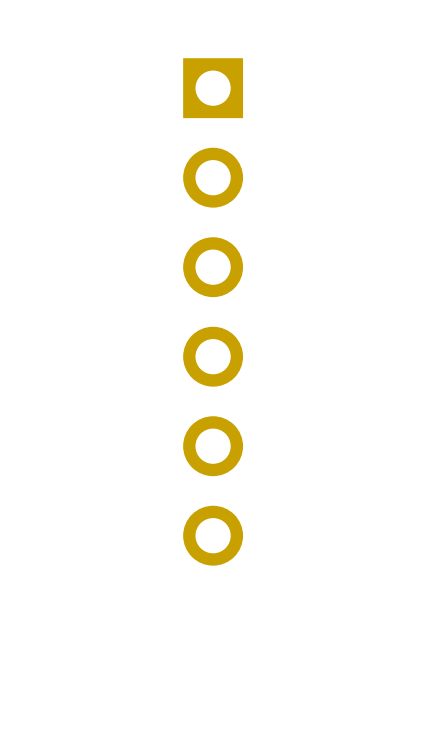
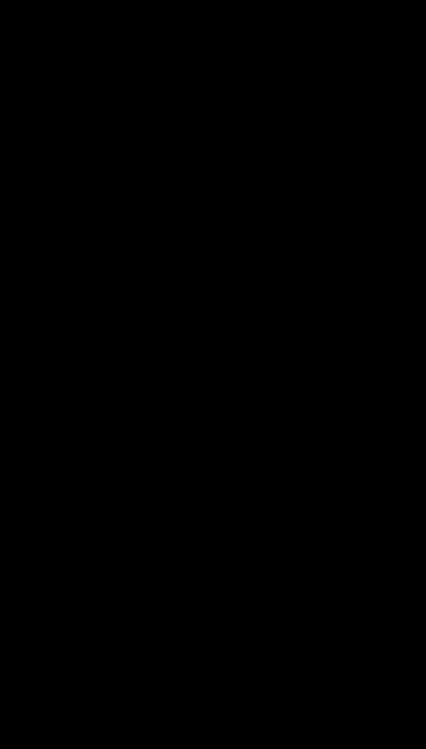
part: (213, 311) -> none

